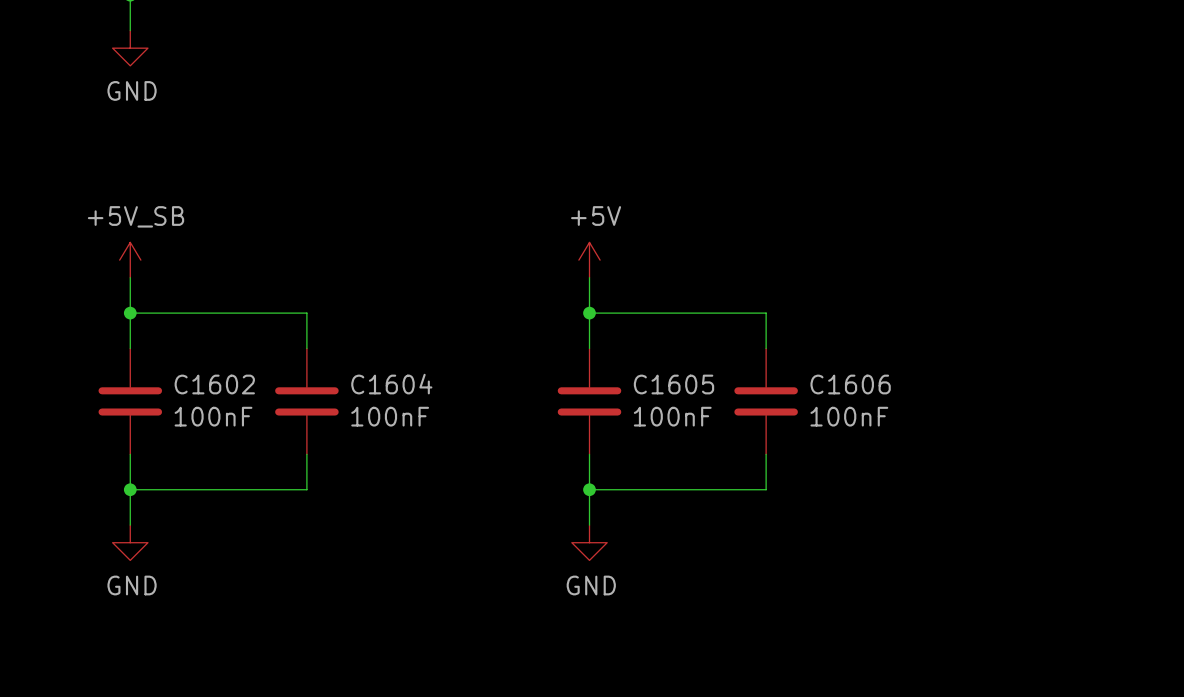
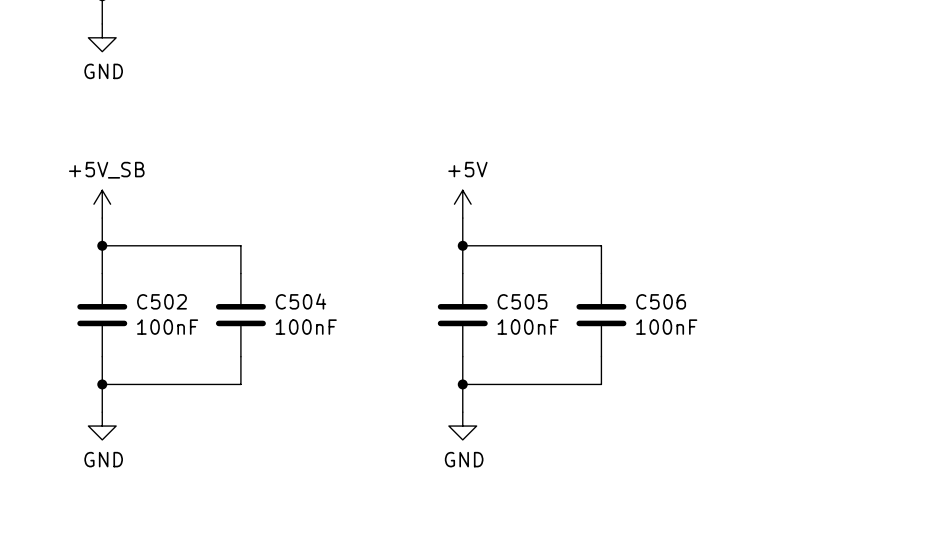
C1602 name: C1602 (214, 384) -> C502 (162, 301)
C1604 name: C1604 (391, 384) -> C504 (300, 301)
C1605 name: C1605 (673, 384) -> C505 (522, 301)
C1606 name: C1606 (850, 384) -> C506 (661, 301)

